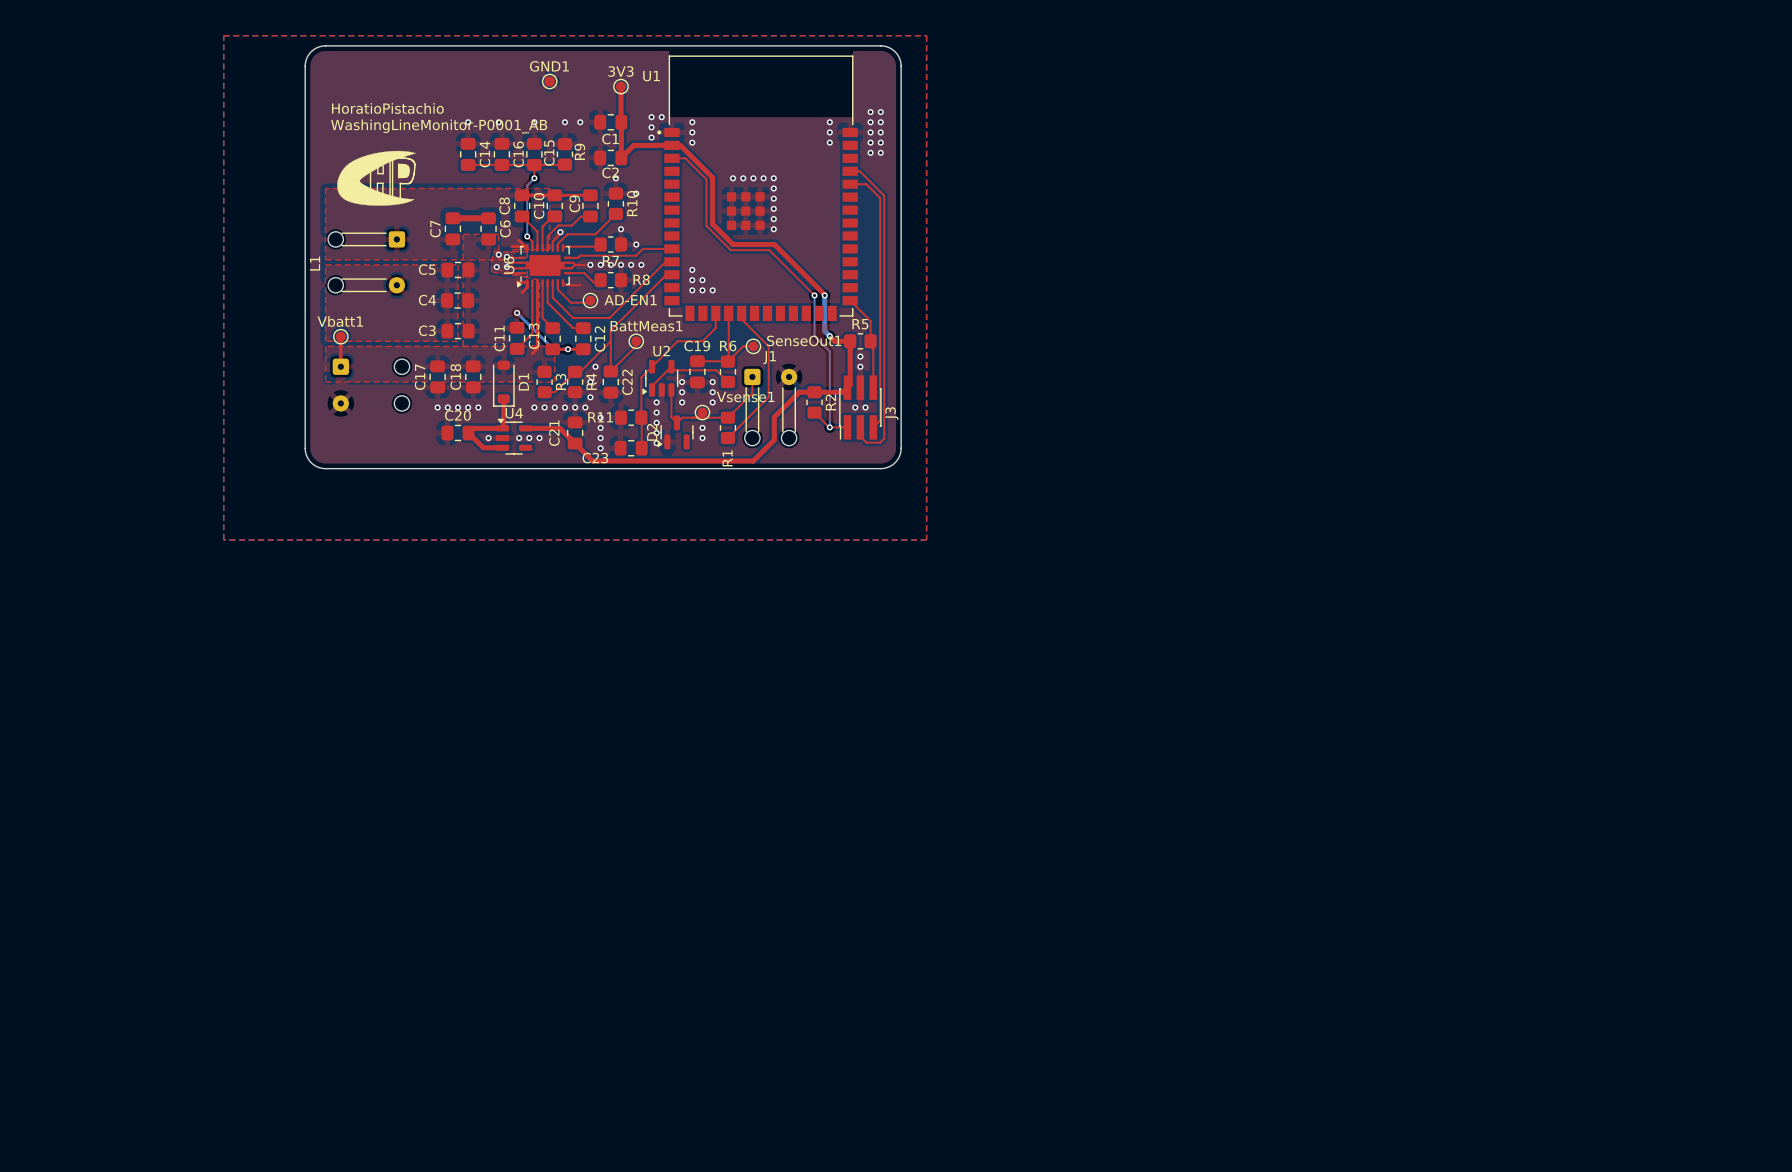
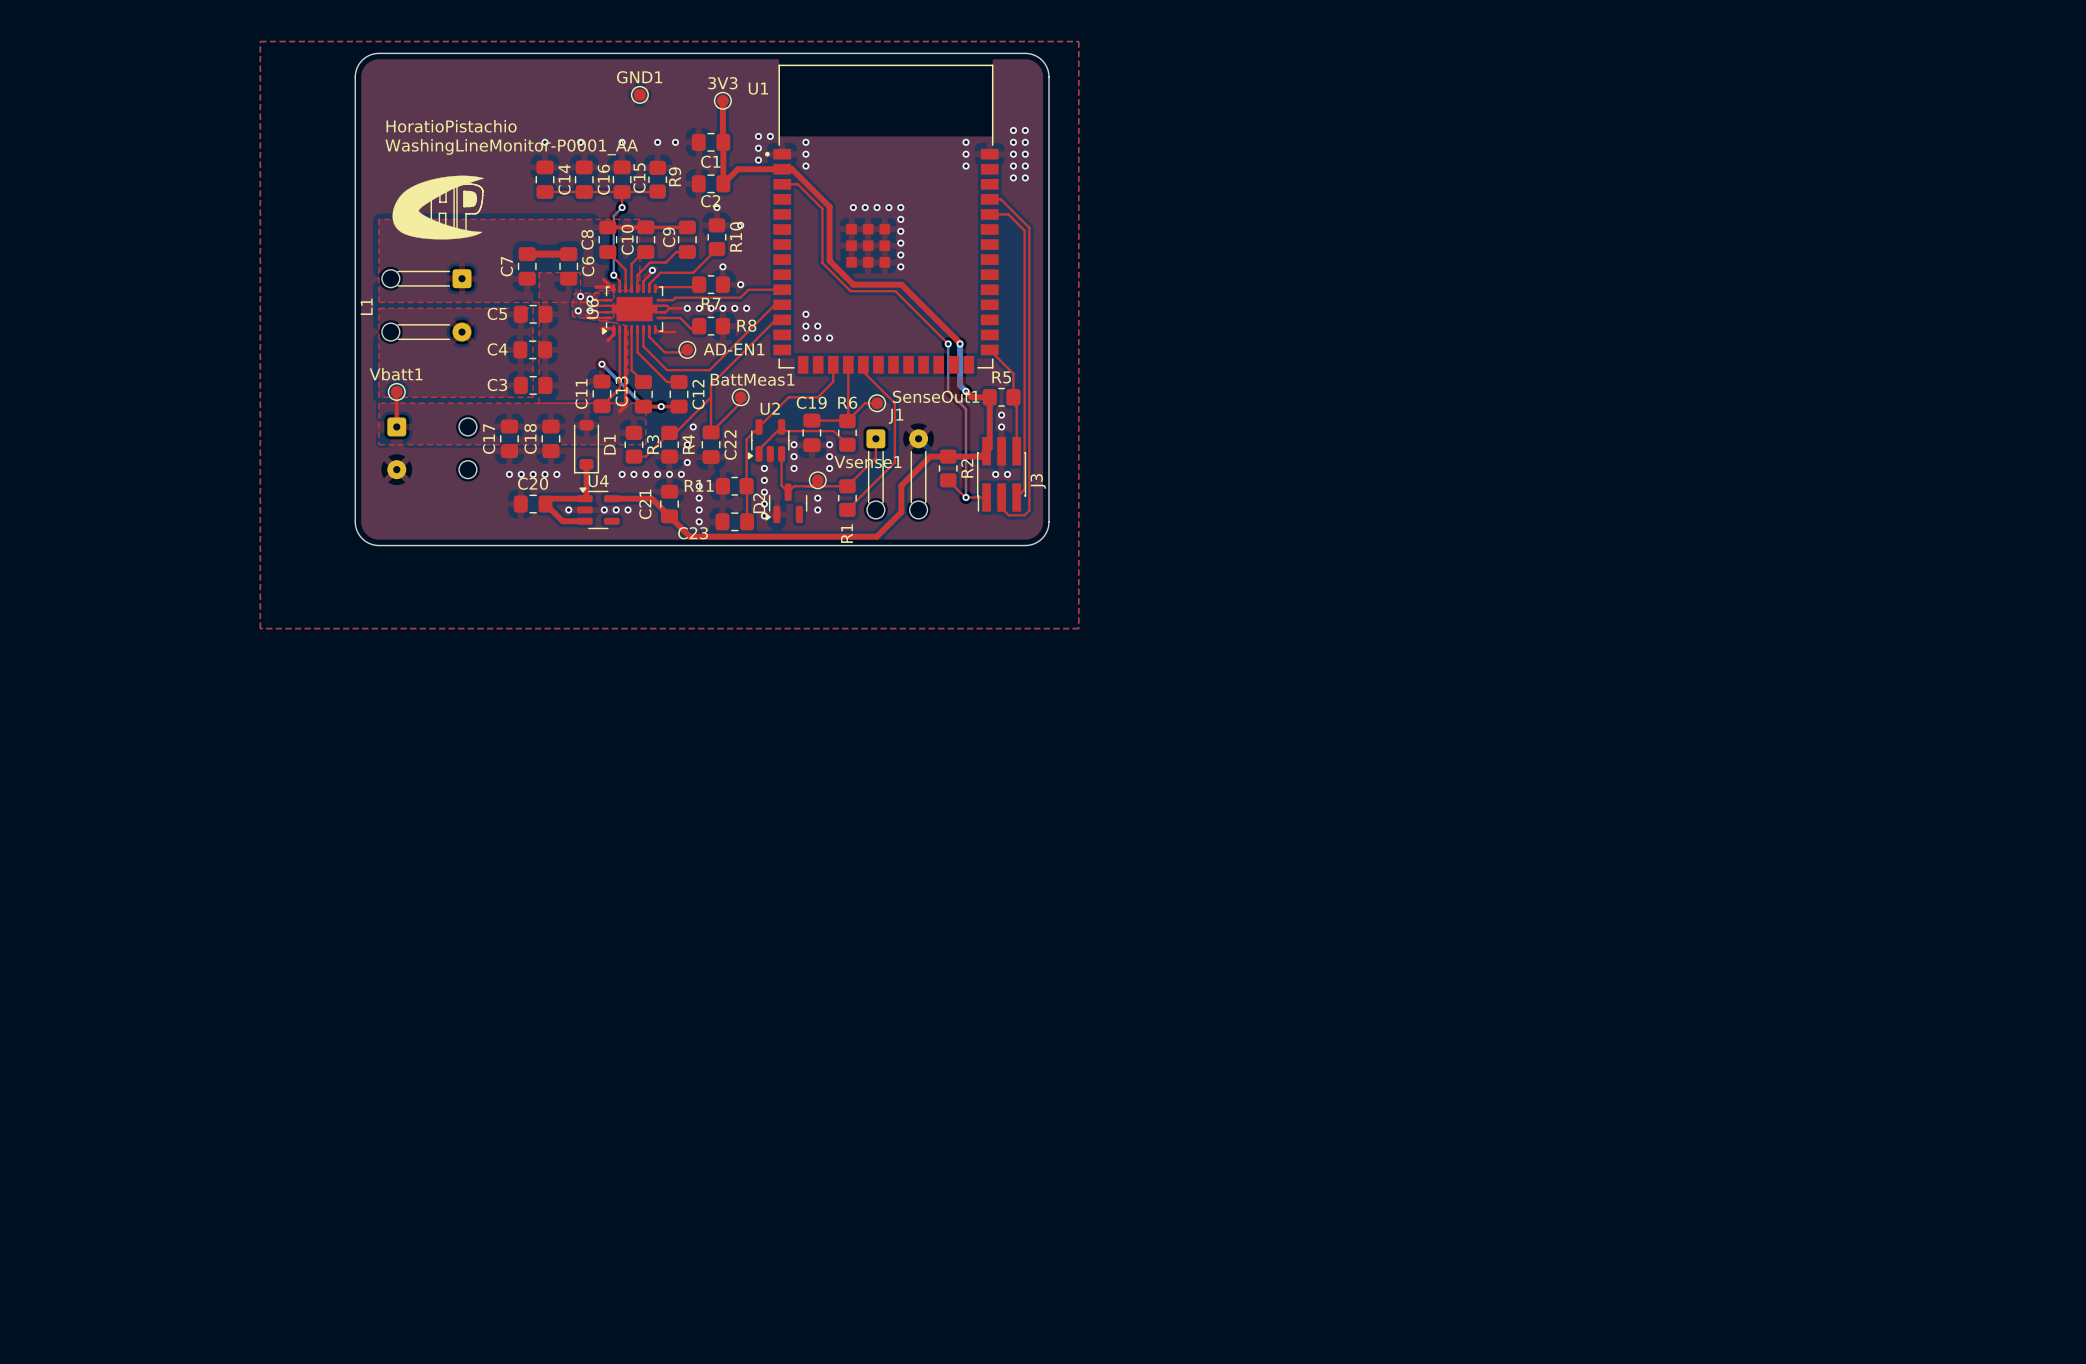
text: WashingLineMonitor-P0001_AB (439, 126) -> WashingLineMonitor-P0001_AA (511, 147)

